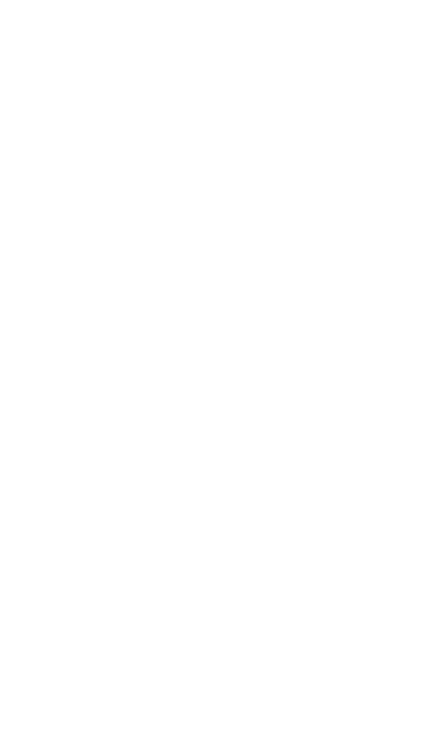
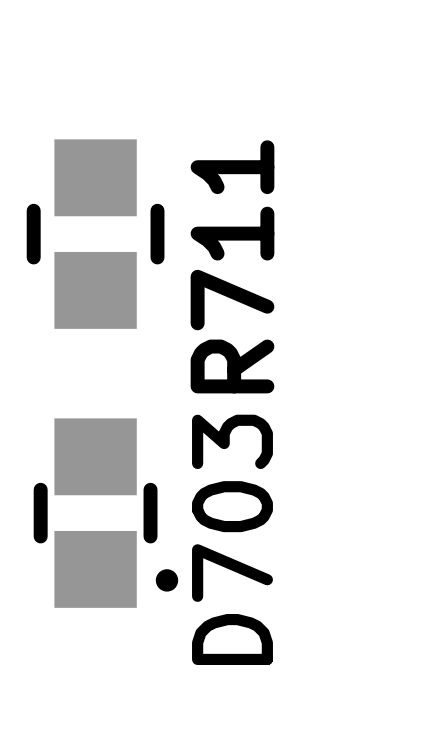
R711: none -> (95, 234)
D703: none -> (105, 513)

